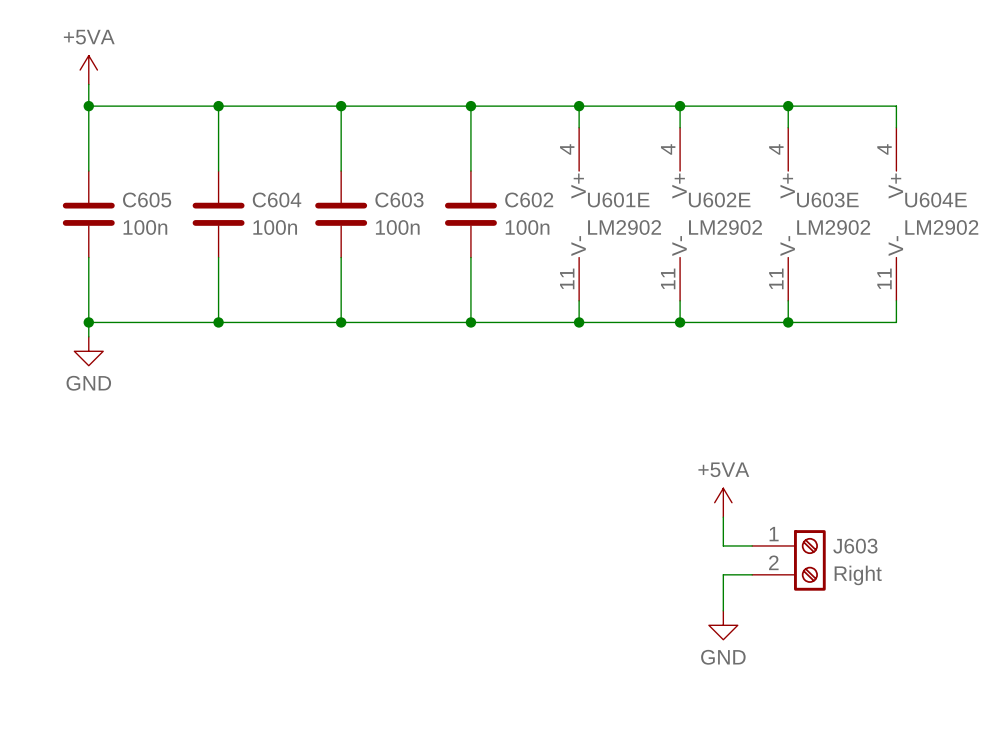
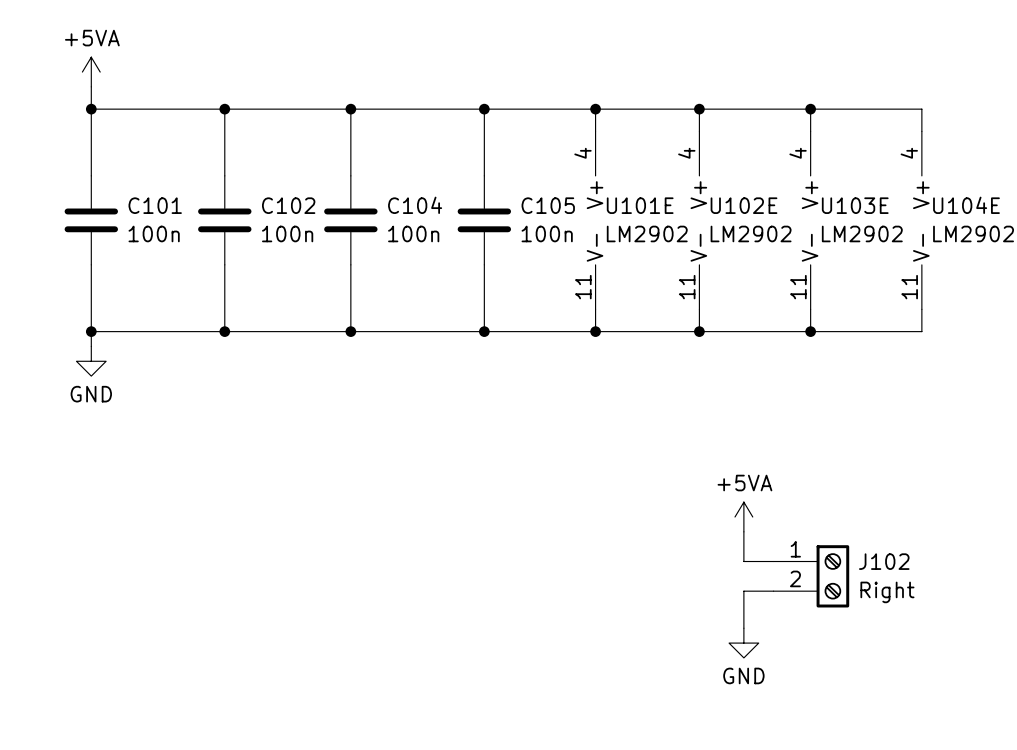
C605 name: C605 (147, 199) -> C101 (155, 205)
C604 name: C604 (277, 199) -> C102 (288, 205)
C603 name: C603 (399, 199) -> C104 (415, 205)
C602 name: C602 (529, 199) -> C105 (548, 205)
U601E name: U601E (618, 199) -> U101E (640, 205)
U602E name: U602E (719, 199) -> U102E (744, 205)
U603E name: U603E (827, 199) -> U103E (855, 205)
U604E name: U604E (936, 199) -> U104E (966, 205)
J603 name: J603 (855, 546) -> J102 (884, 561)

